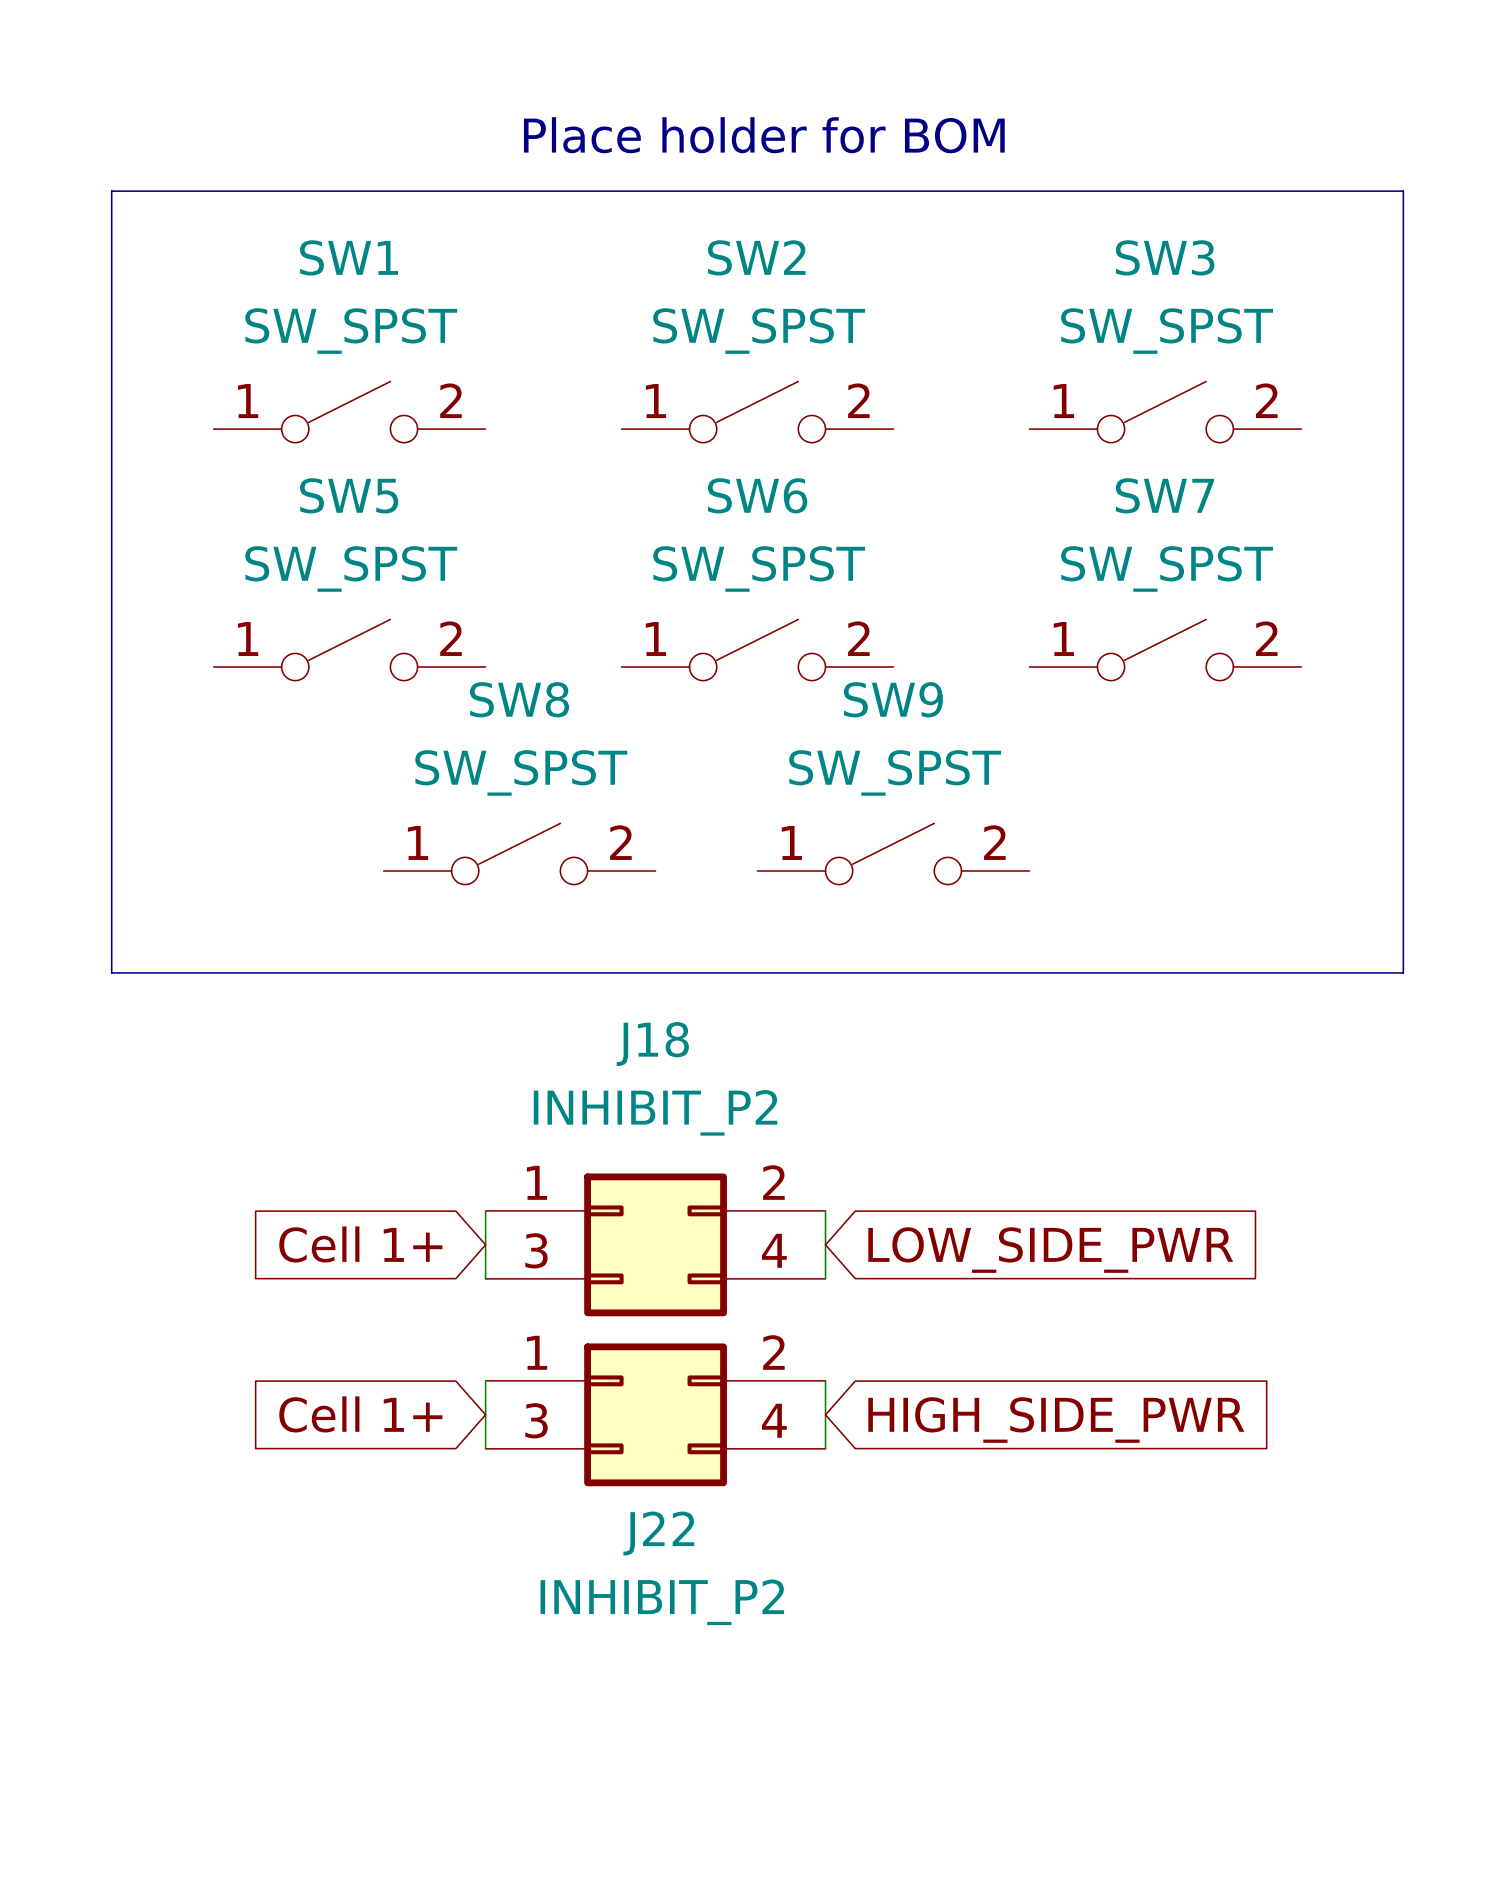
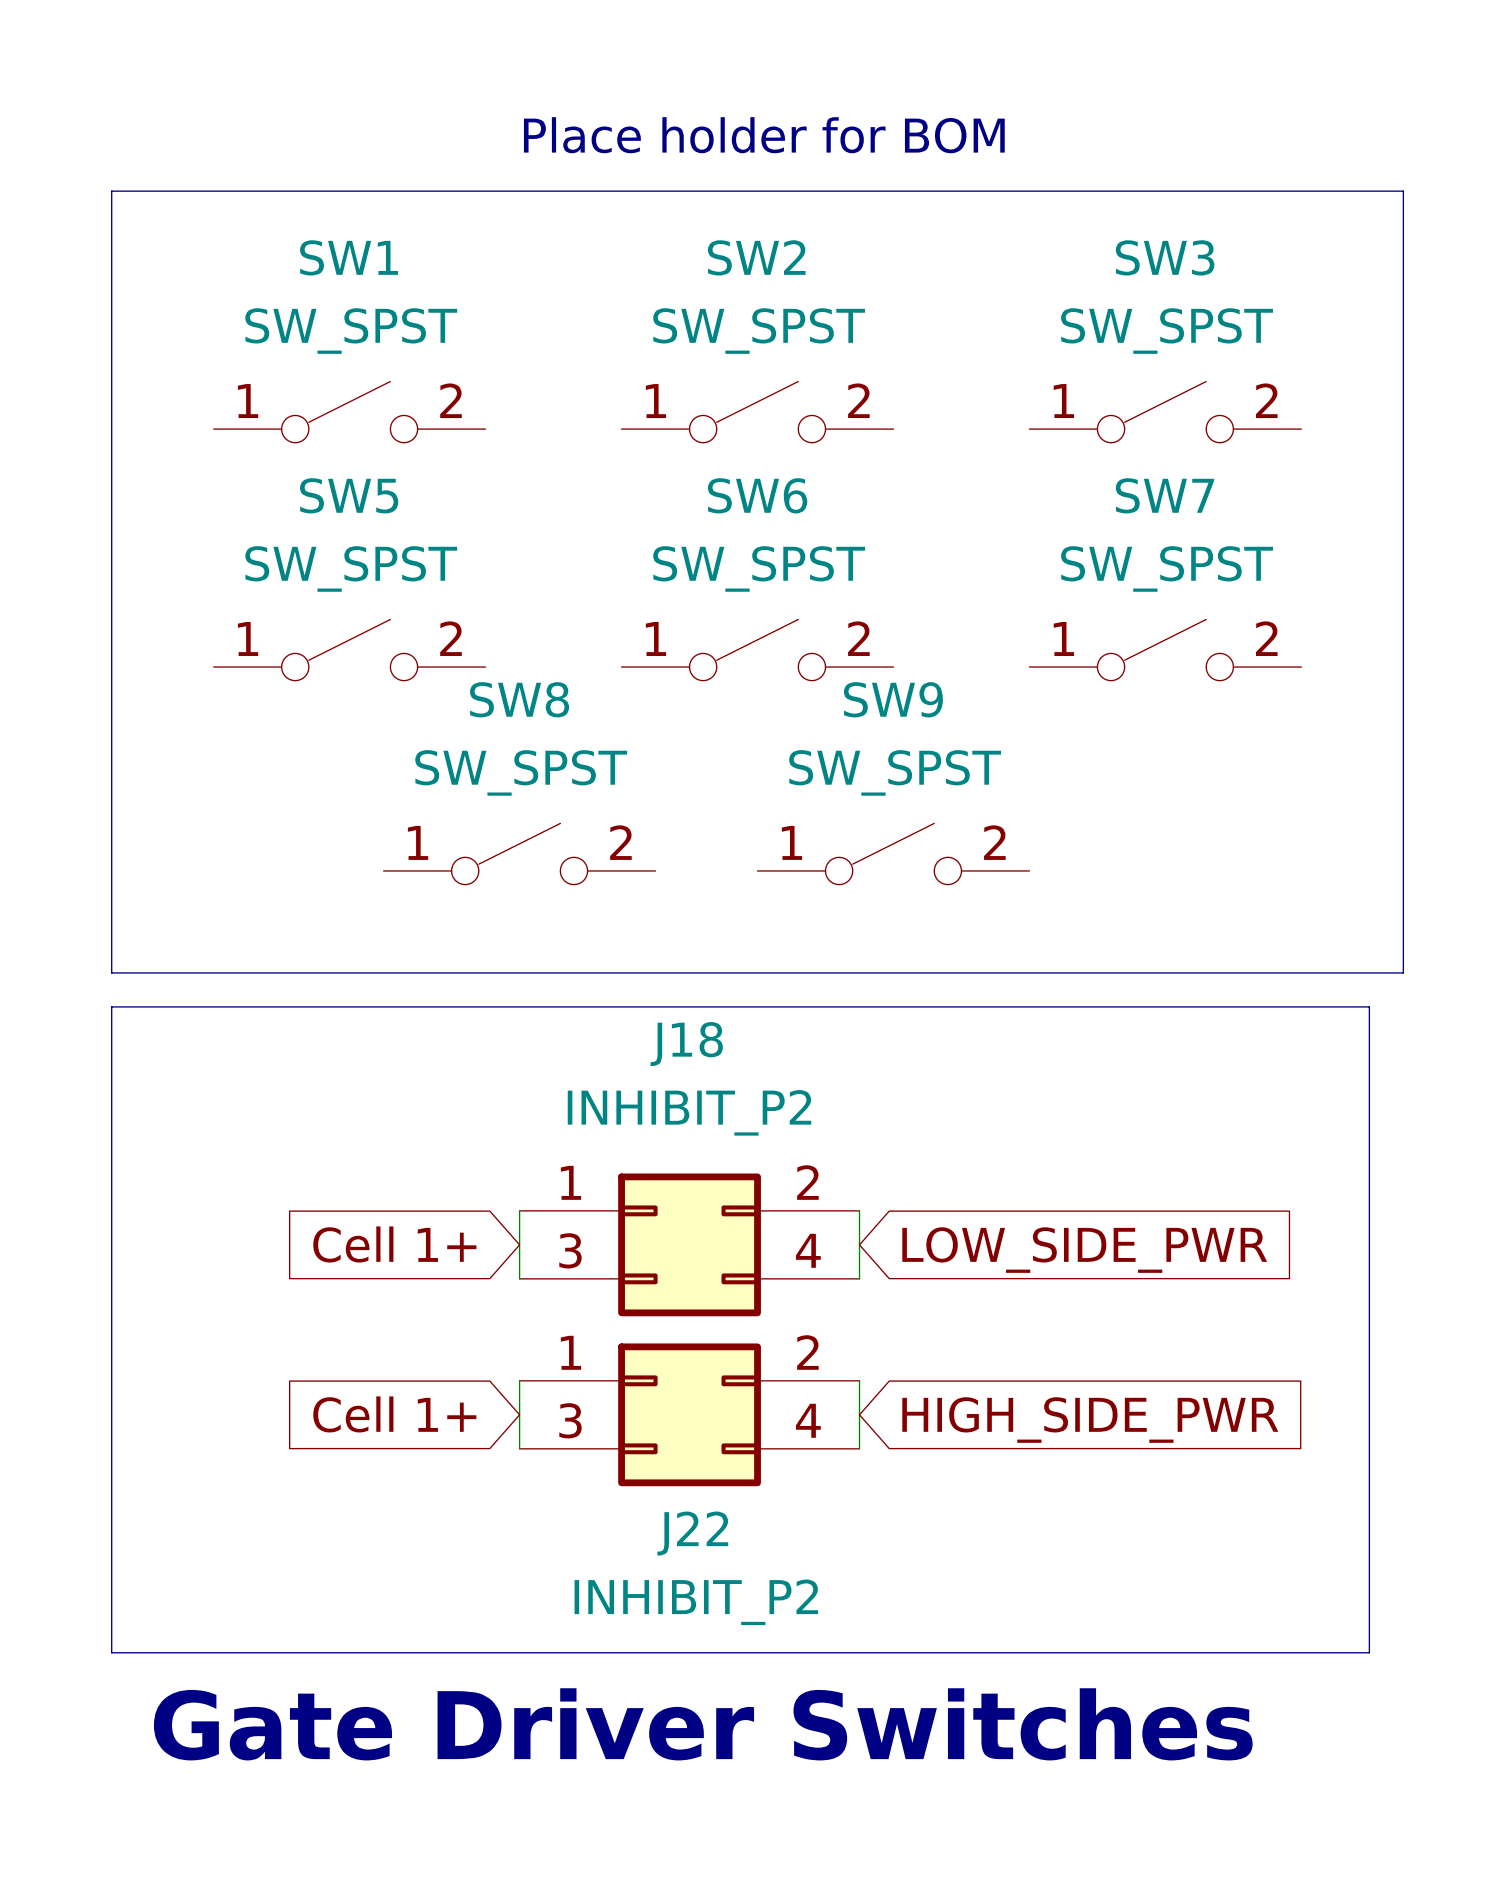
line: none -> (111, 1006) (1369, 1006) (1369, 1652) (111, 1652) (111, 1006)
wire: (485, 1210) (485, 1278) -> (519, 1210) (519, 1278)
wire: (825, 1210) (825, 1278) -> (859, 1210) (859, 1278)
global label position: Cell 1+ (360, 1244) -> Cell 1+ (394, 1244)
J18 position: (655, 1244) -> (689, 1244)
global label position: LOW_SIDE_PWR (1050, 1250) -> LOW_SIDE_PWR (1084, 1250)
wire: (485, 1380) (485, 1448) -> (519, 1380) (519, 1448)
wire: (825, 1380) (825, 1448) -> (859, 1380) (859, 1448)
global label position: Cell 1+ (360, 1414) -> Cell 1+ (394, 1414)
J22 position: (655, 1414) -> (689, 1414)
global label position: HIGH_SIDE_PWR (1056, 1420) -> HIGH_SIDE_PWR (1090, 1420)
text: none -> Gate Driver Switches (703, 1724)

